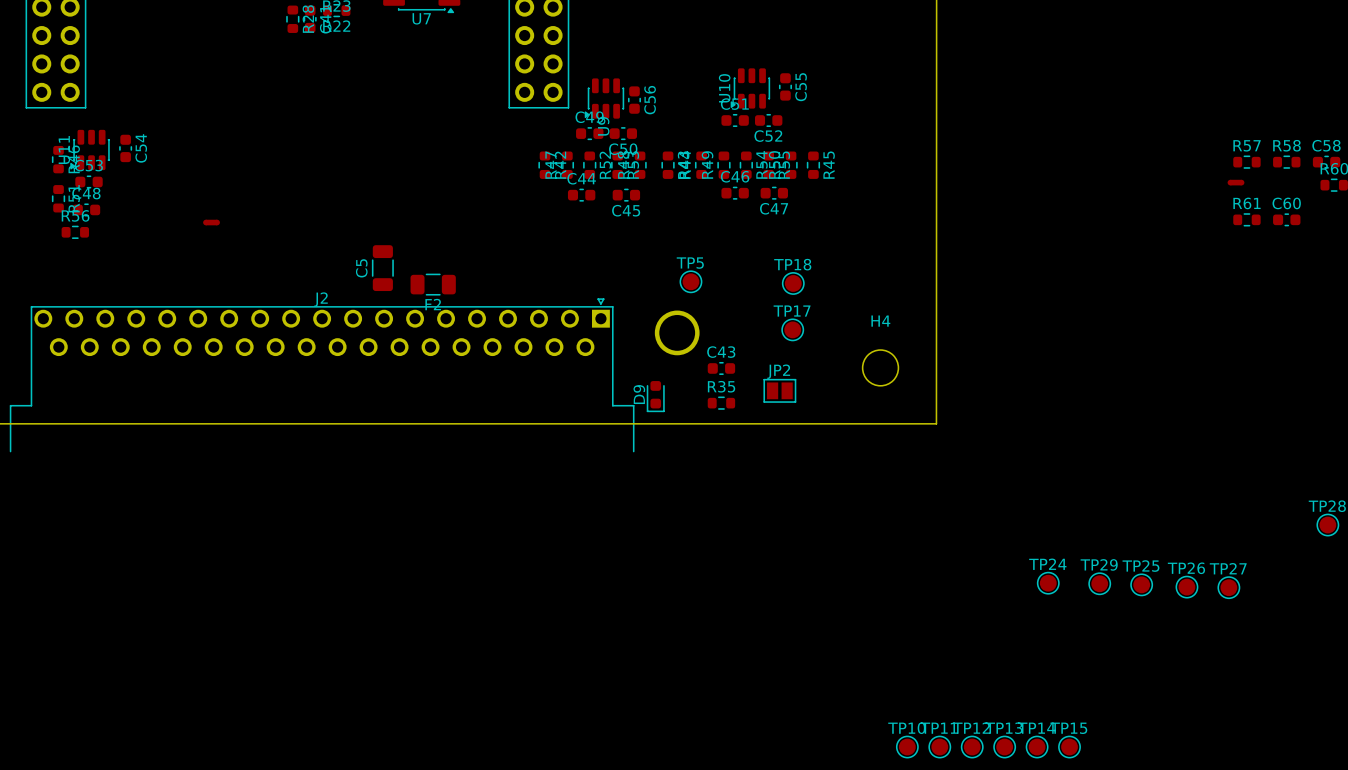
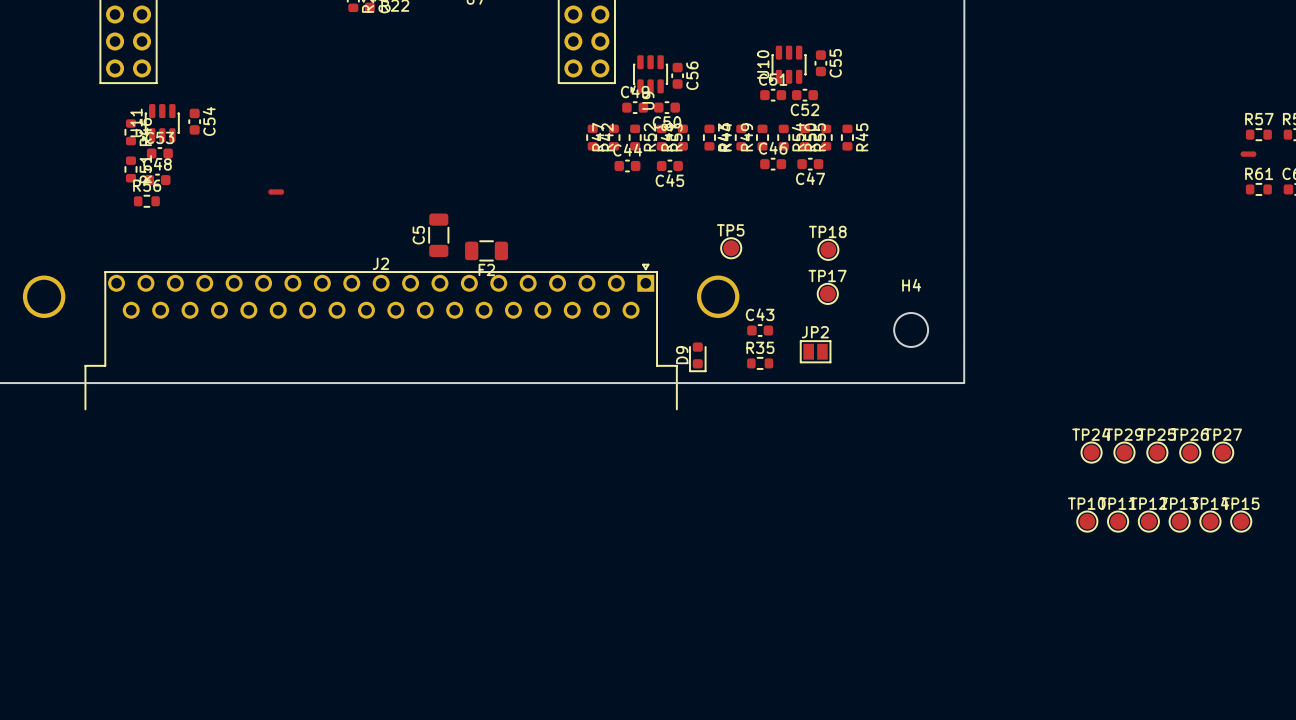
TP24 position: (1048, 583) -> (1091, 452)
TP29 position: (1099, 583) -> (1124, 452)
TP25 position: (1141, 584) -> (1157, 452)
TP26 position: (1186, 587) -> (1190, 452)
TP27 position: (1228, 587) -> (1223, 452)
TP10 position: (907, 747) -> (1087, 521)
TP11 position: (939, 747) -> (1118, 521)
TP12 position: (972, 747) -> (1148, 521)
TP13 position: (1004, 747) -> (1179, 521)
TP14 position: (1037, 747) -> (1210, 521)
TP15 position: (1069, 747) -> (1241, 521)

